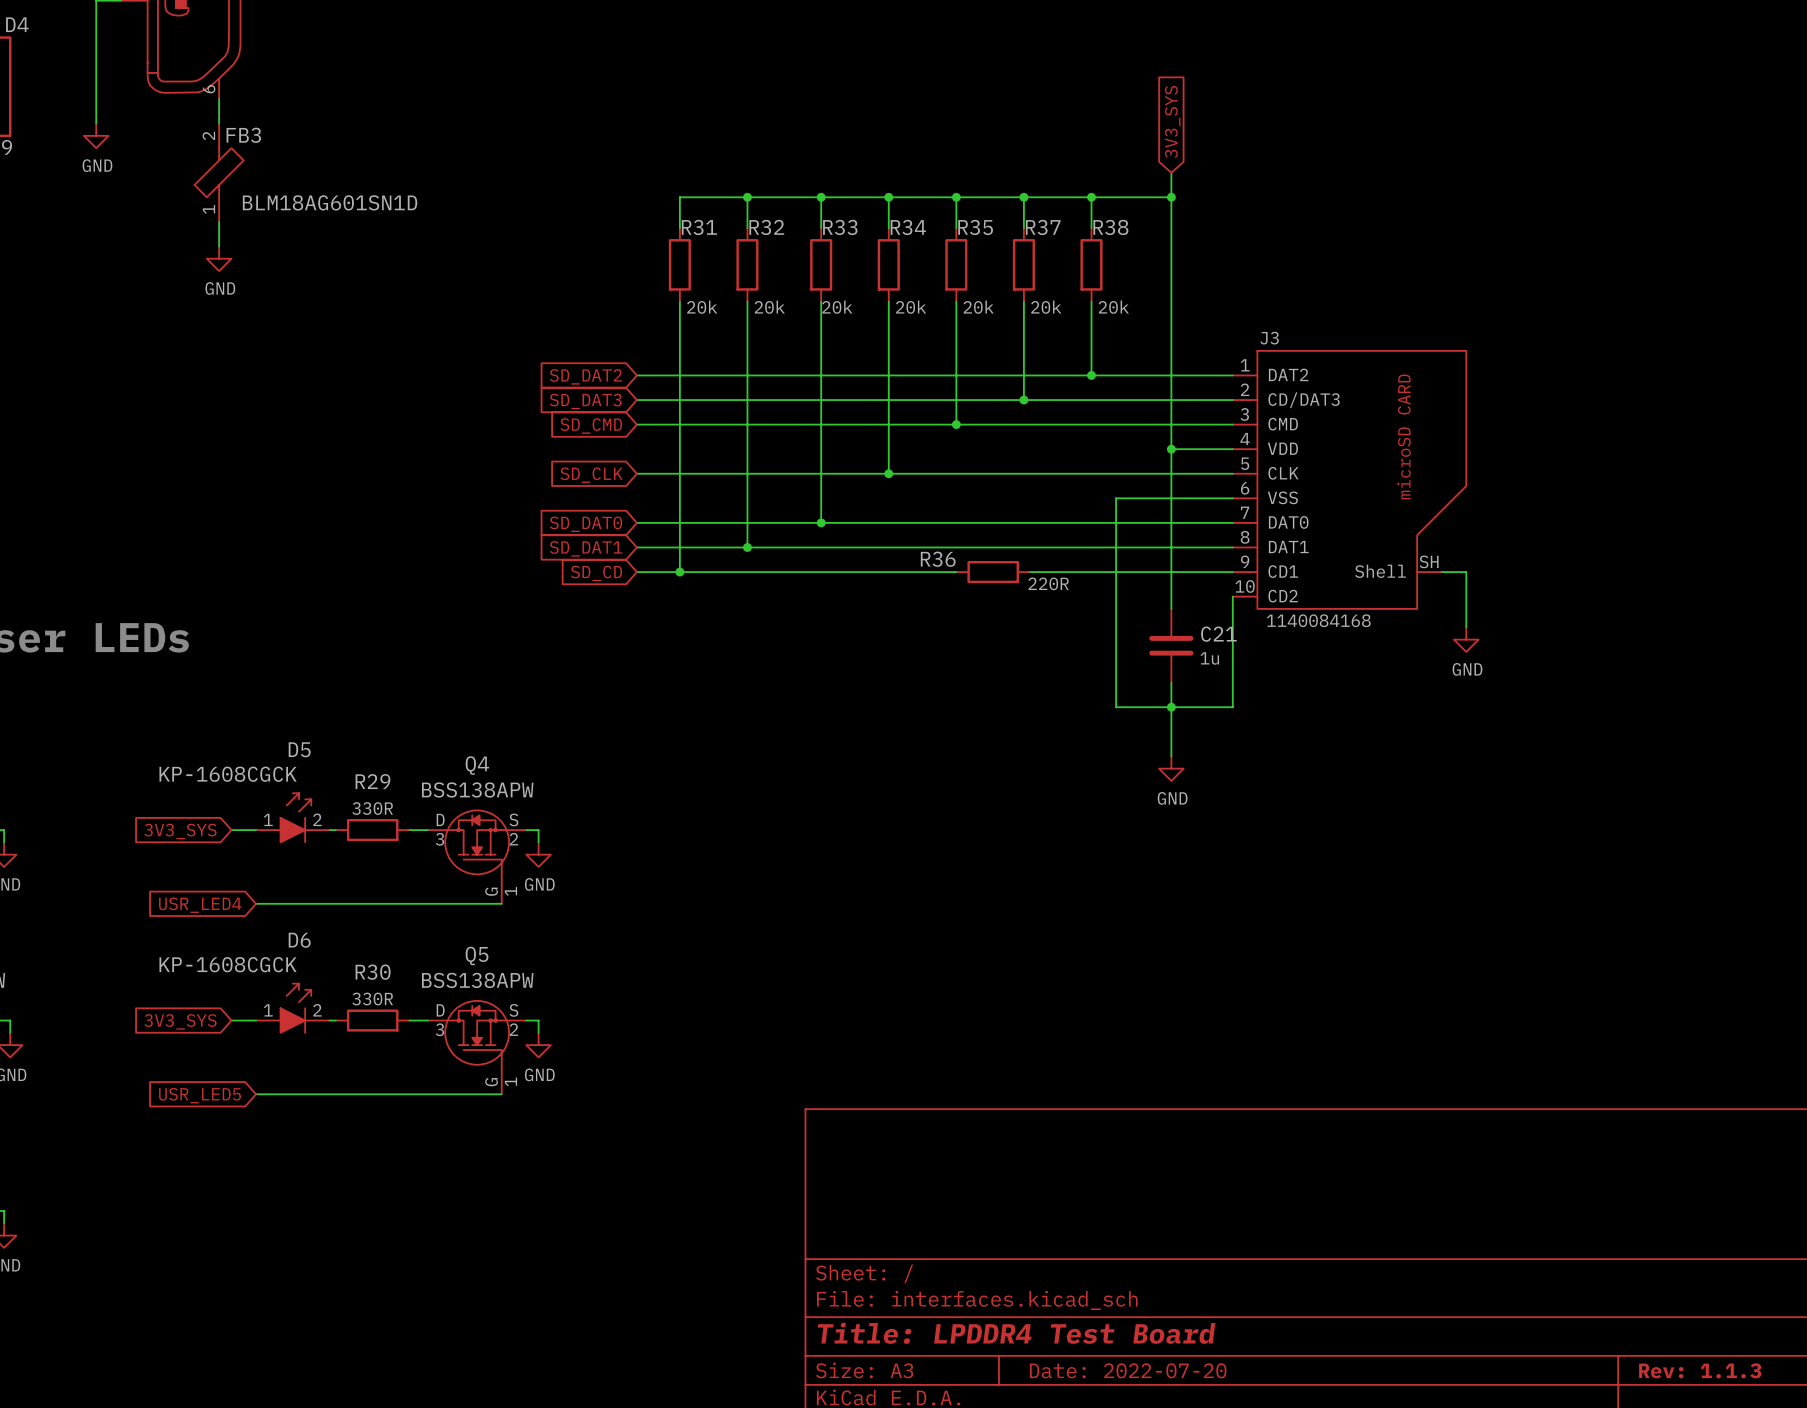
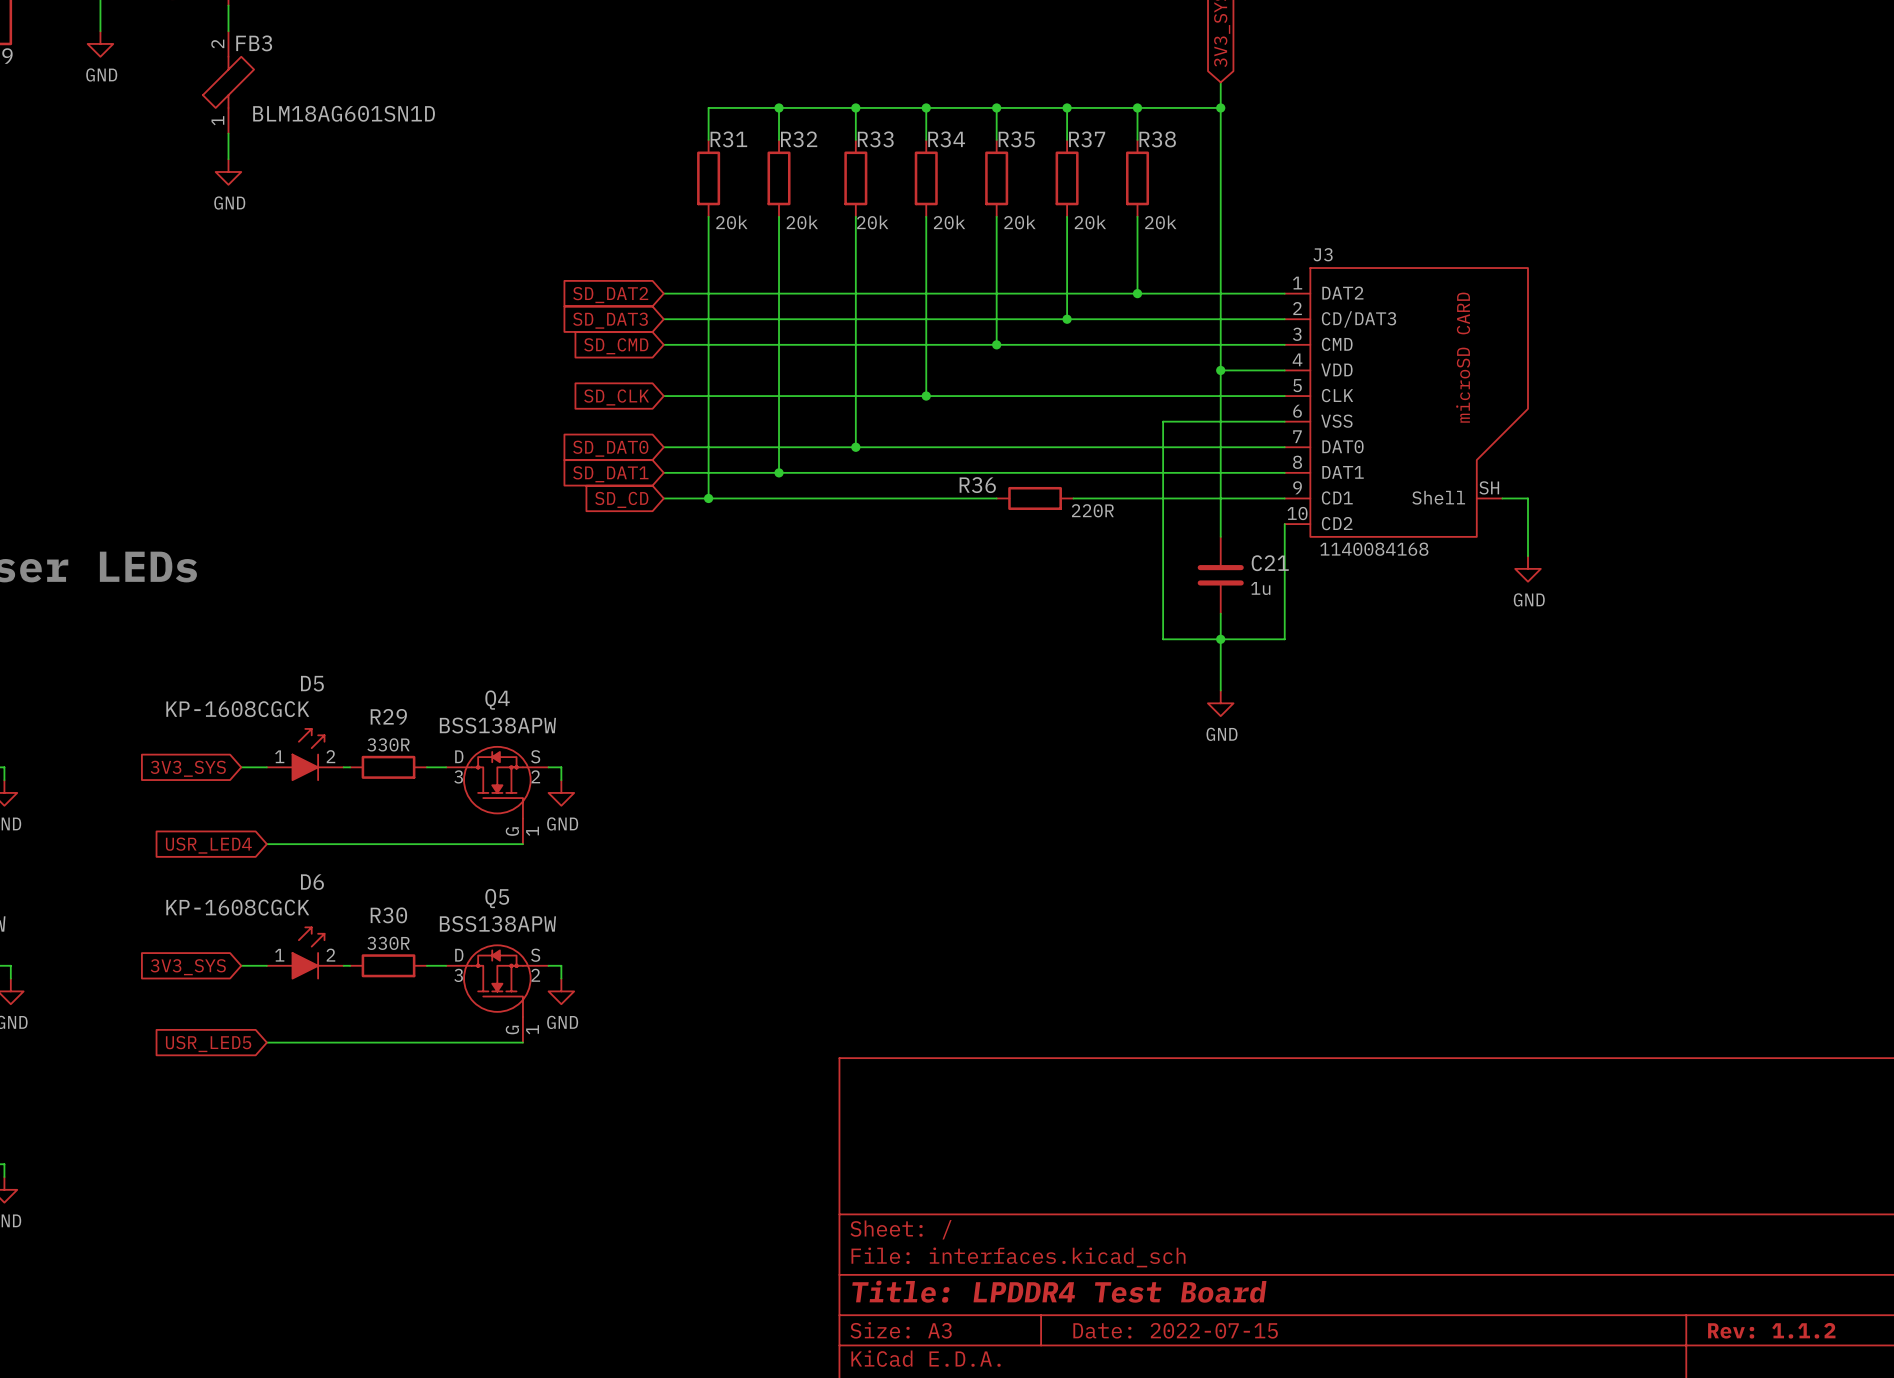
title block: Date: 2022-07-20 (1128, 1370) -> Date: 2022-07-15 (1175, 1330)
title block: Rev: 1.1.3 (1700, 1370) -> Rev: 1.1.2 (1771, 1330)

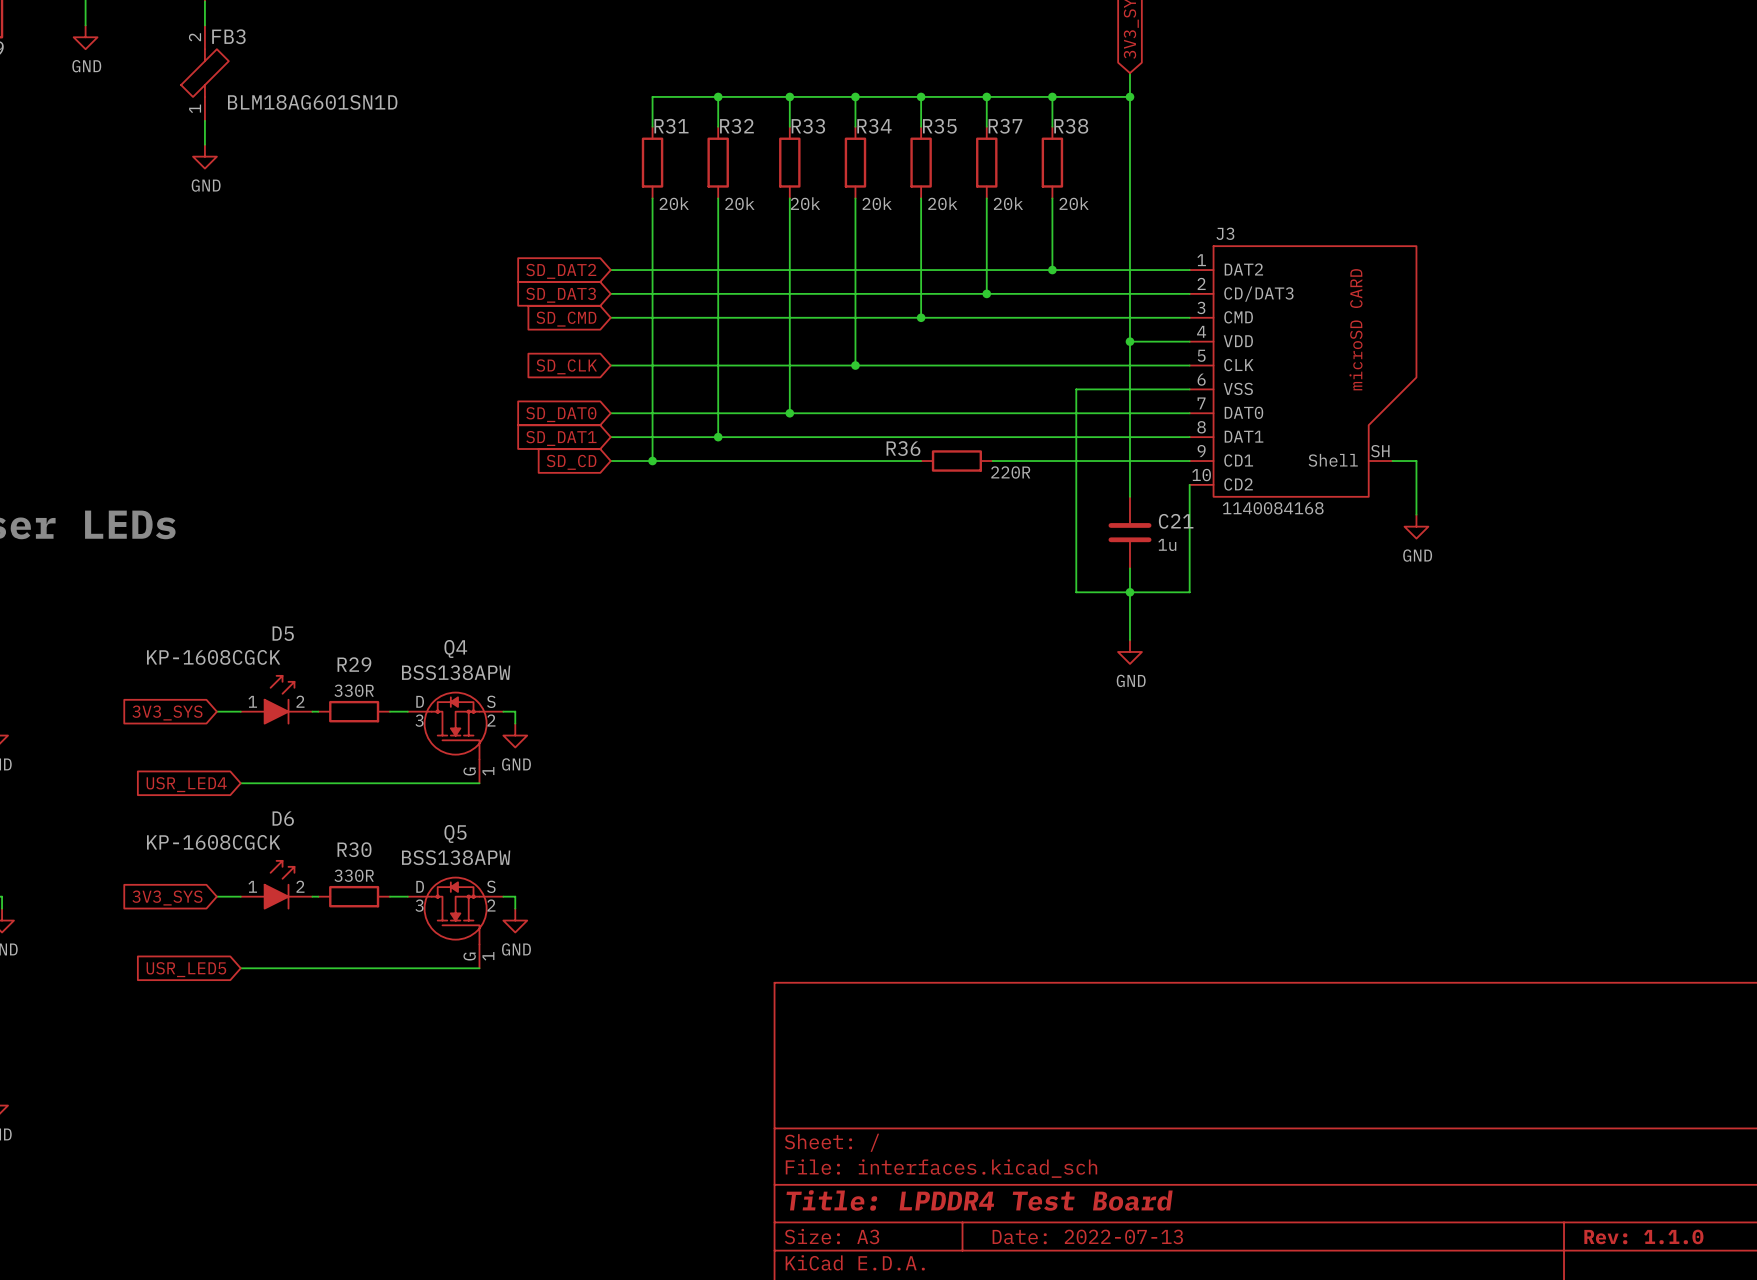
title block: Date: 2022-07-15 (1175, 1330) -> Date: 2022-07-13 (1087, 1236)
title block: Rev: 1.1.2 (1771, 1330) -> Rev: 1.1.0 (1643, 1236)

